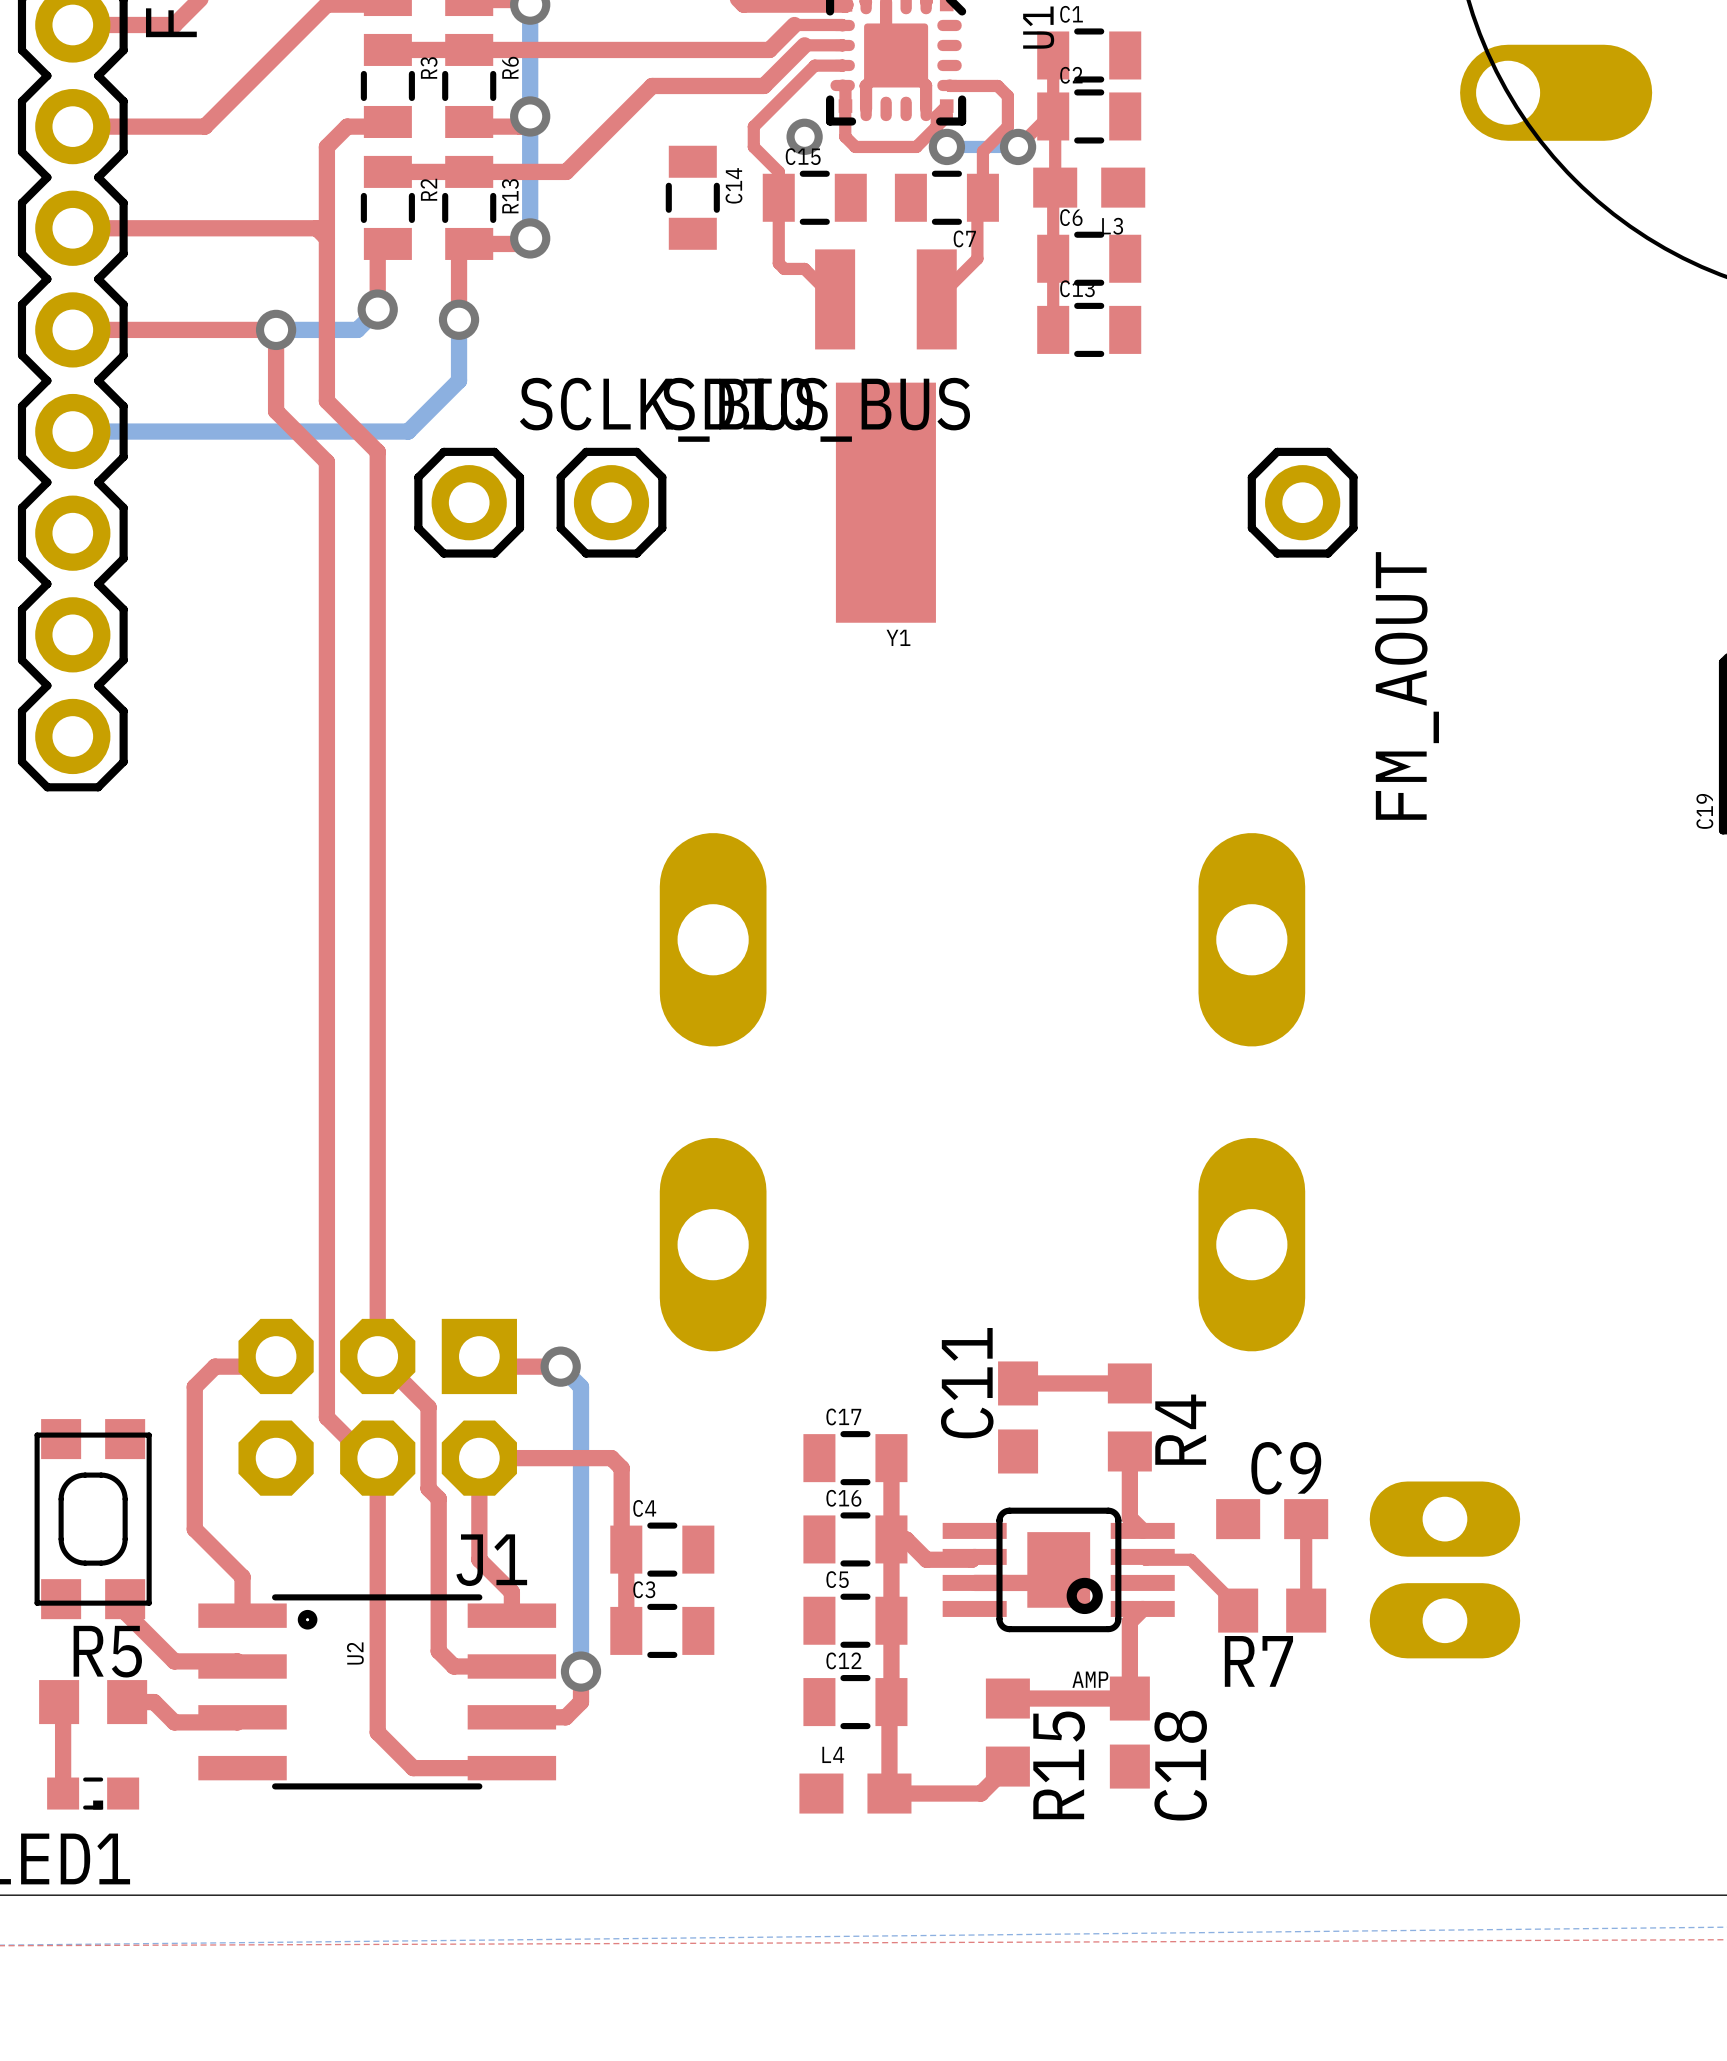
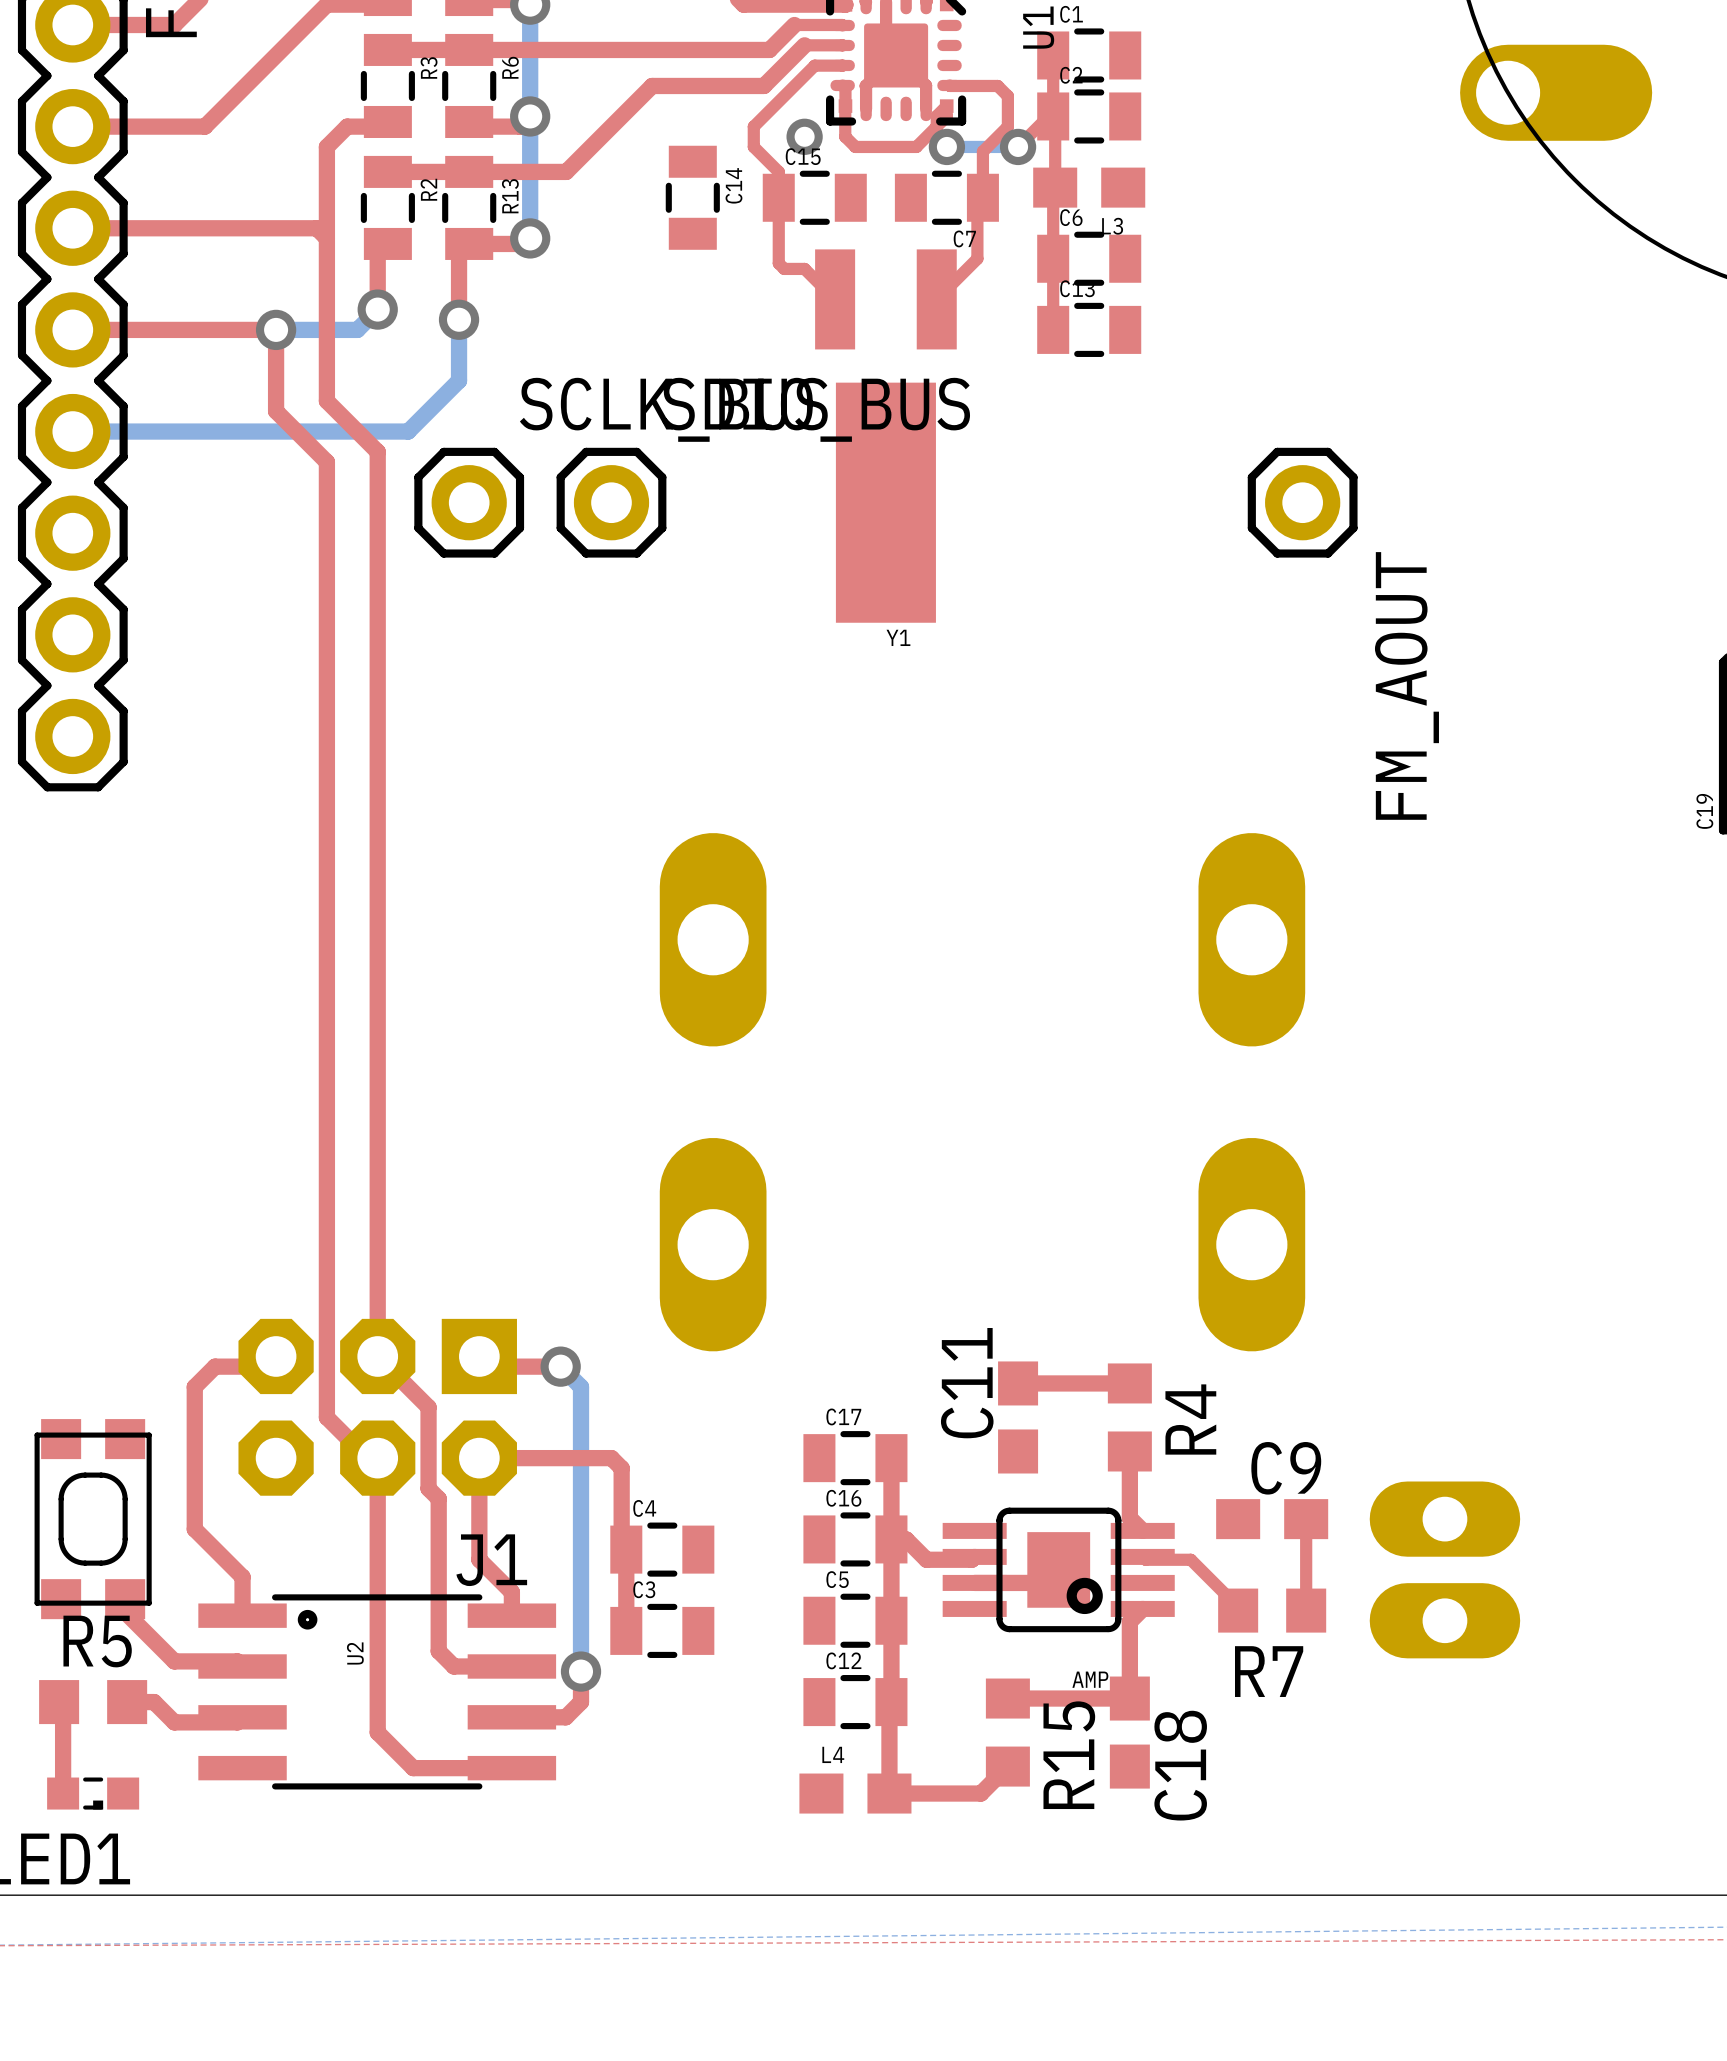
R4 name position: R4 (1180, 1429) -> R4 (1190, 1419)
R5 name position: R5 (107, 1651) -> R5 (97, 1641)
R7 name position: R7 (1258, 1661) -> R7 (1269, 1671)
R15 name position: R15 (1059, 1765) -> R15 (1069, 1755)

